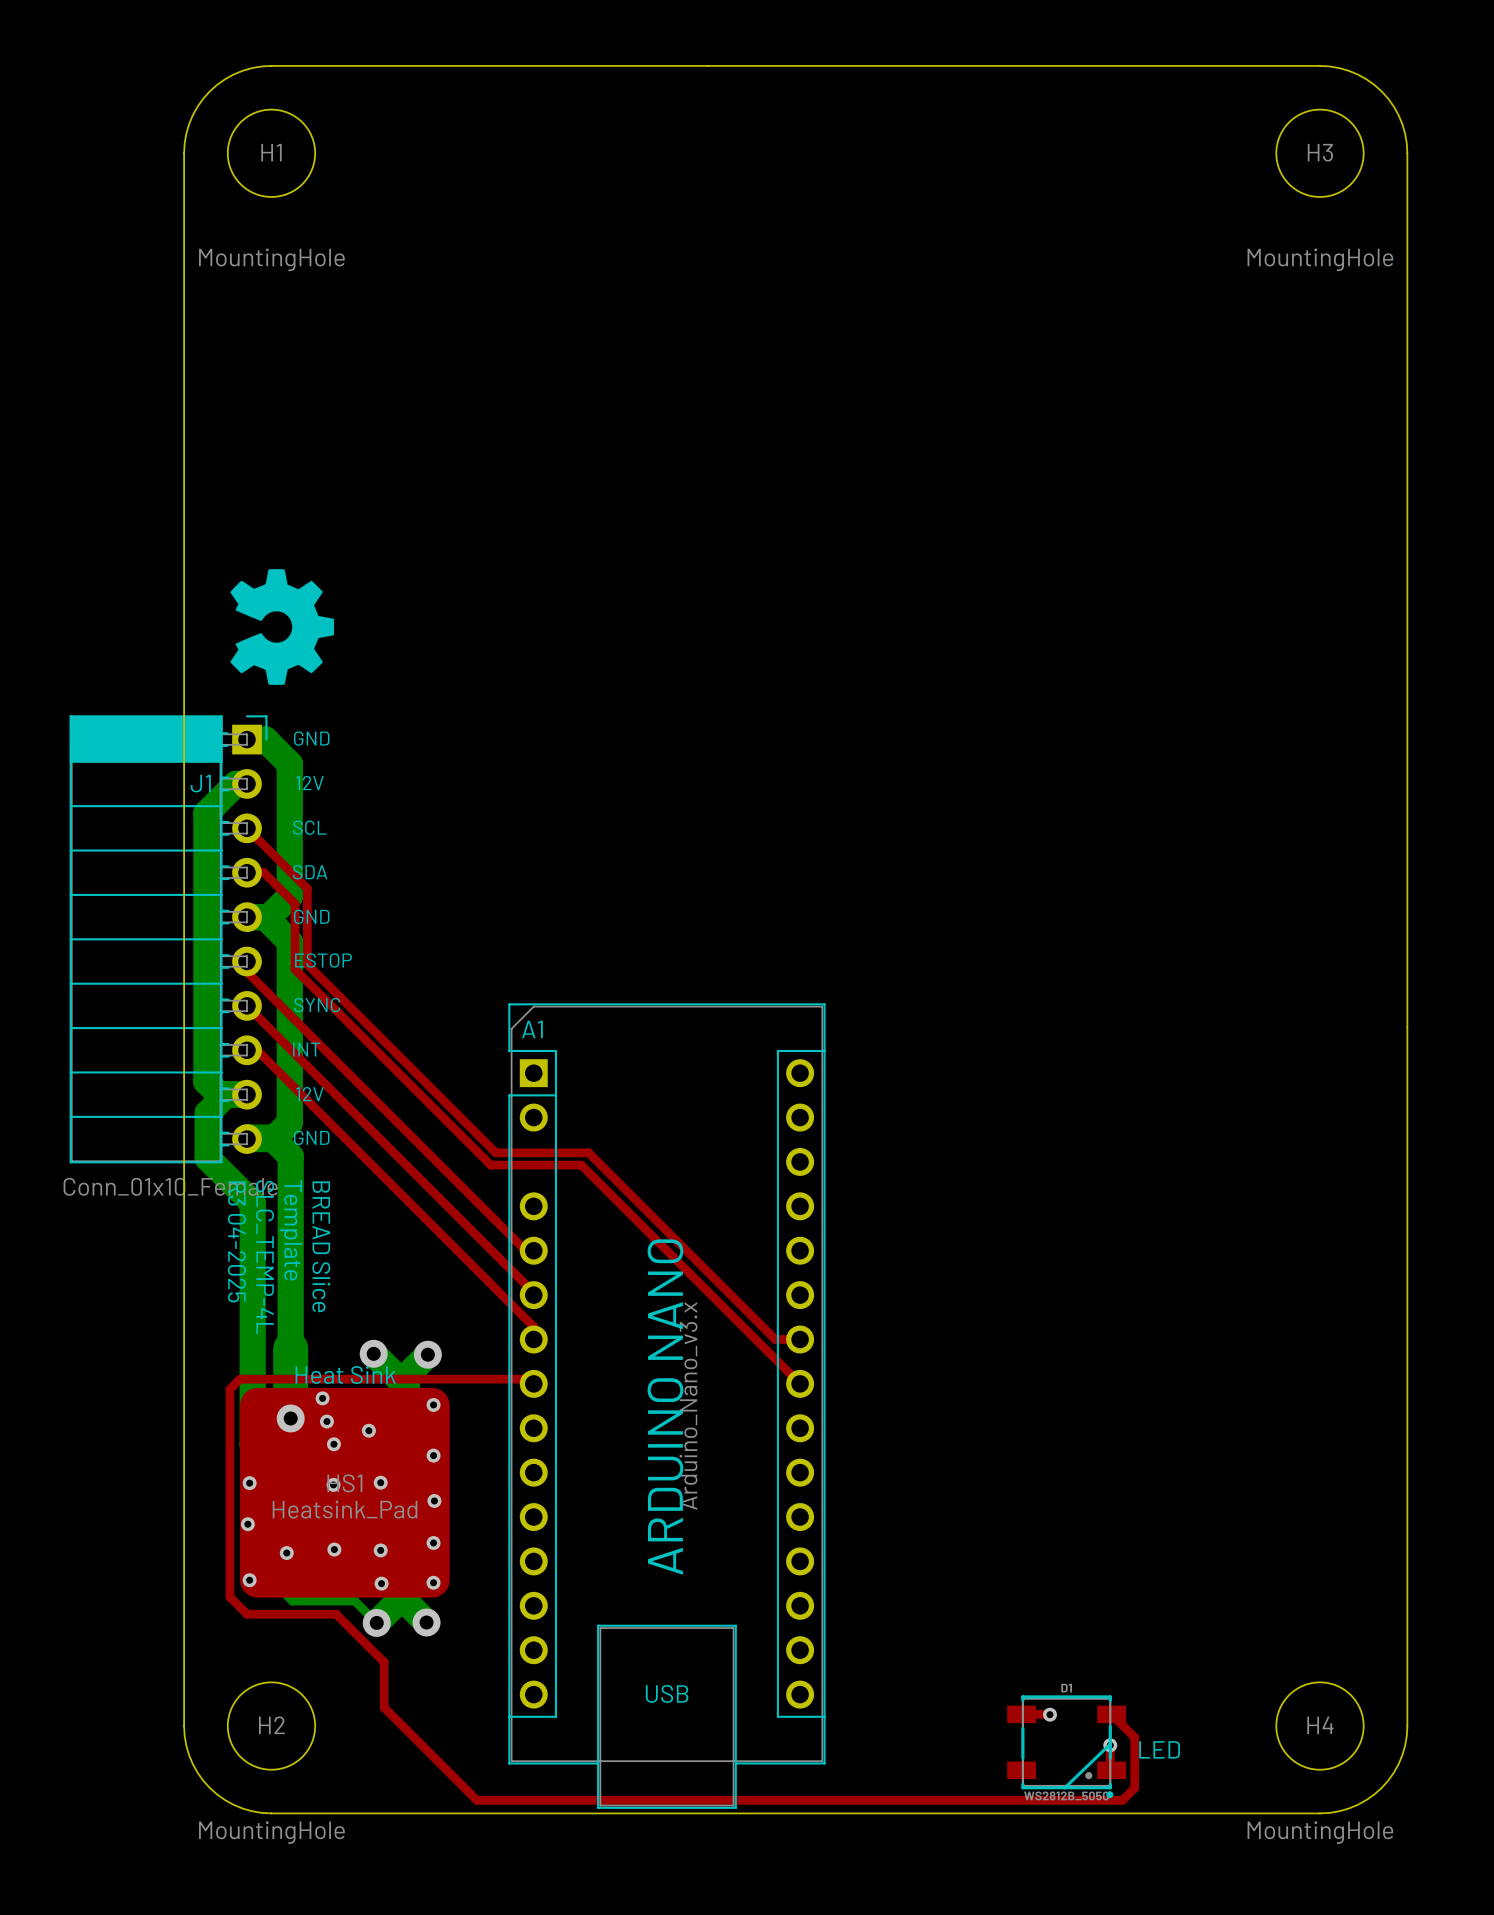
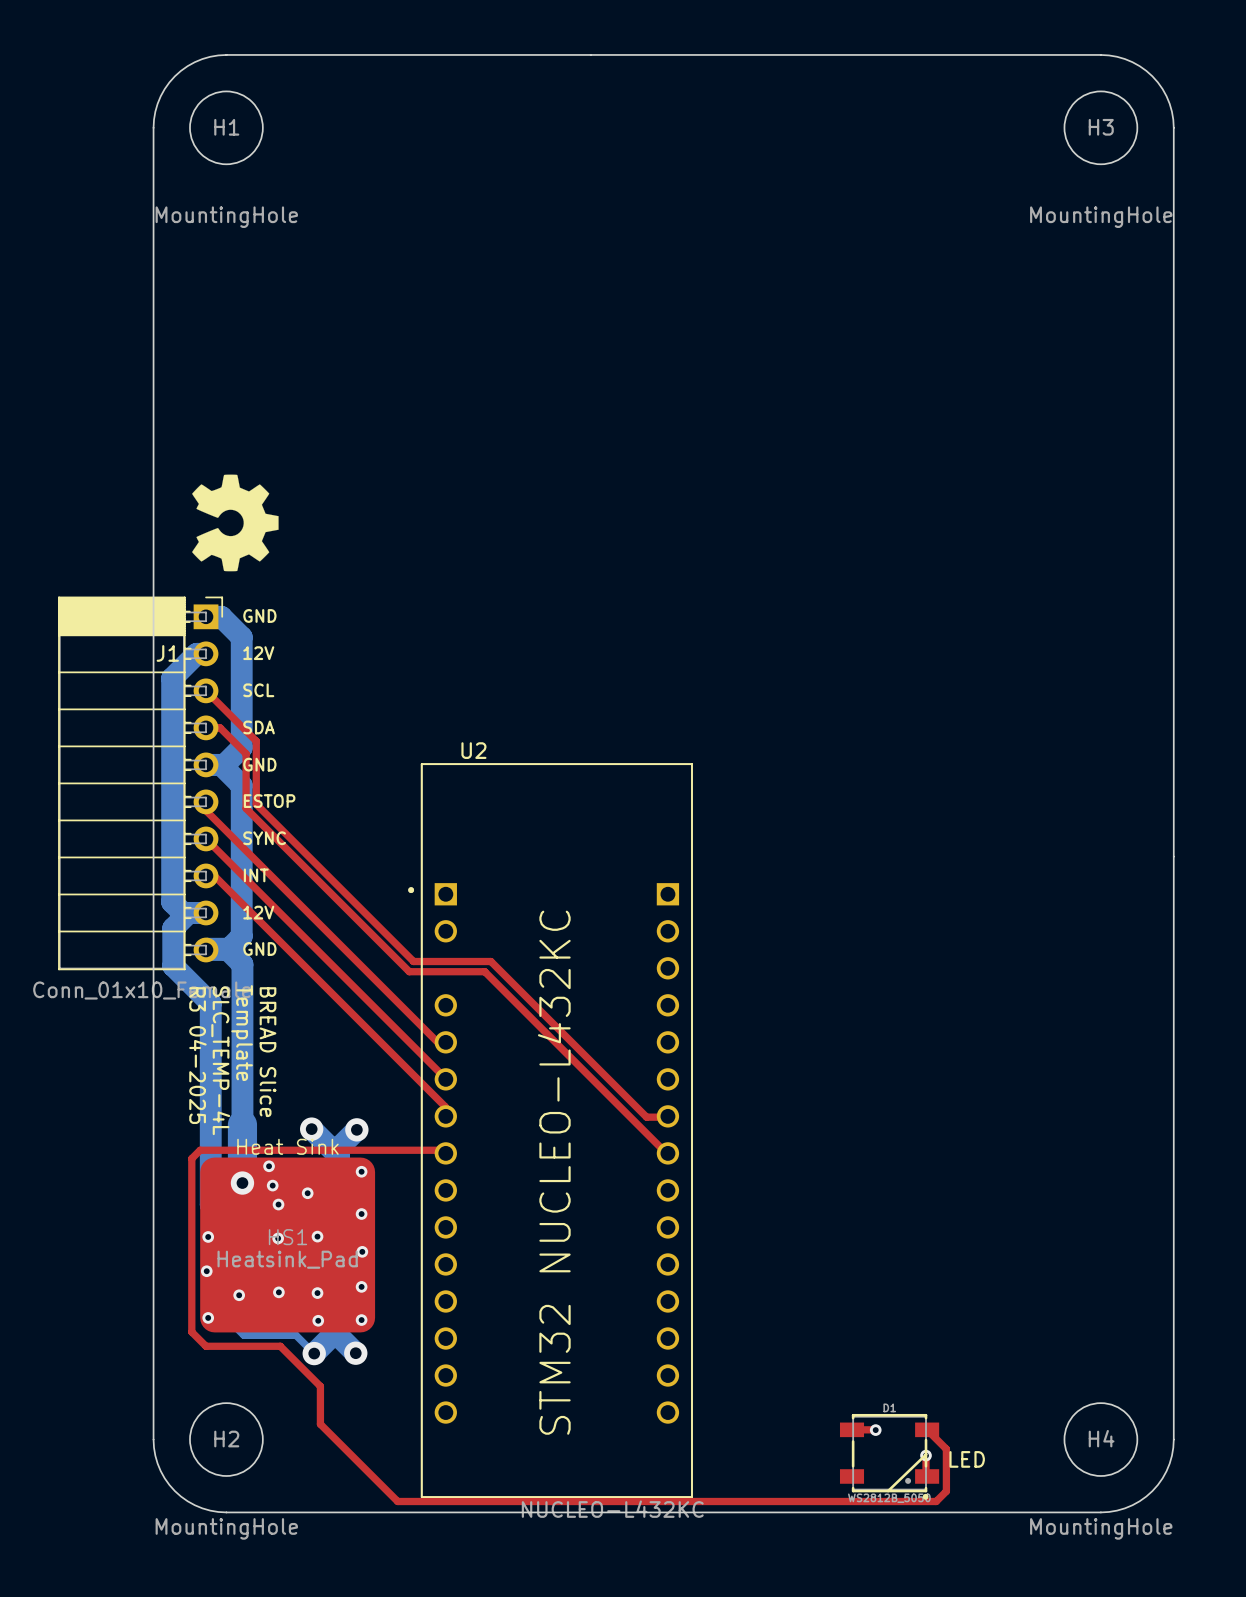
U2: none -> NUCLEO-L432KC (550, 1130)
A1: Arduino_Nano_v3.x (666, 1406) -> none
text: ARDUINO NANO (665, 1407) -> STM32 NUCLEO-L432KC (554, 1172)

